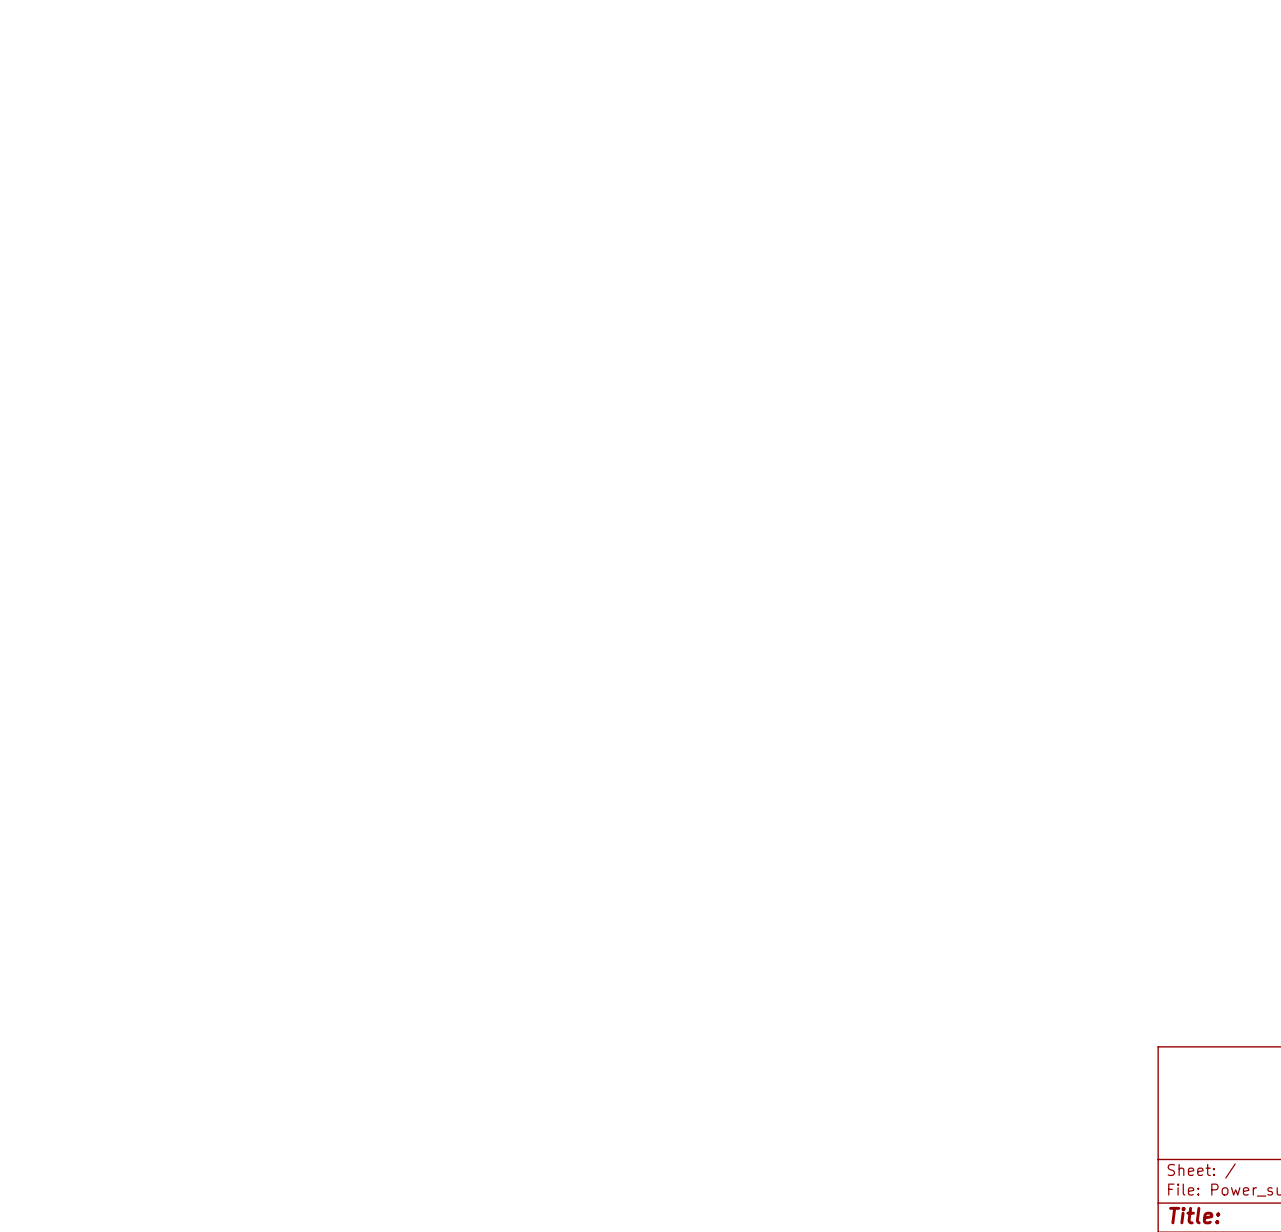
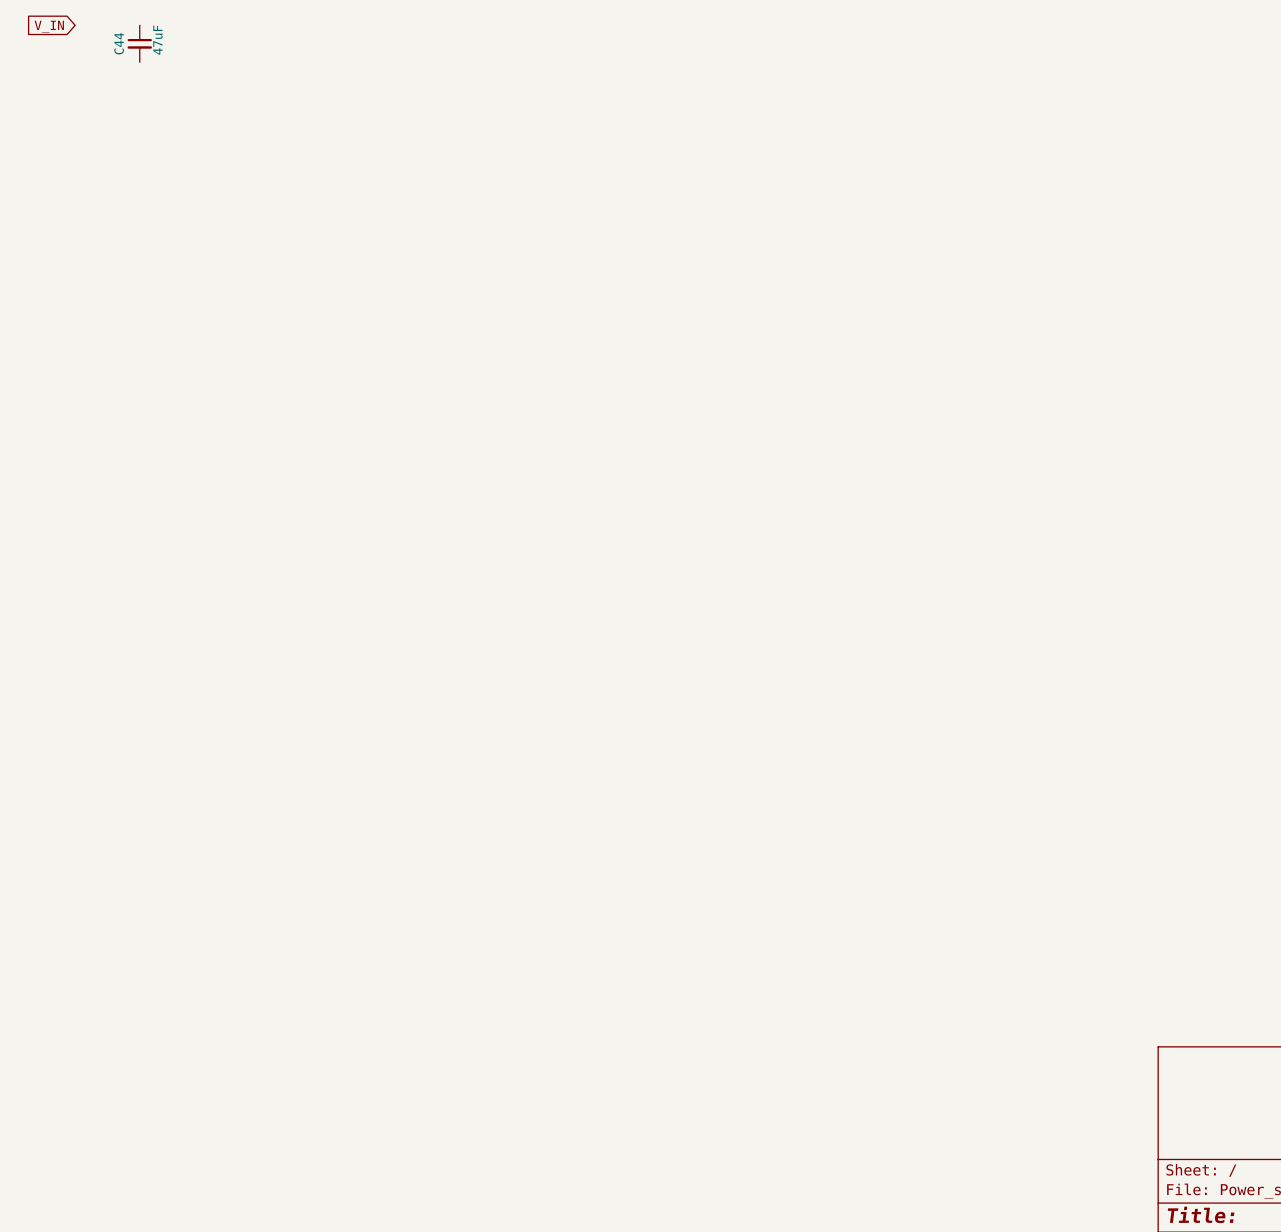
global label: none -> V_IN (49, 26)
C44: none -> 47uF (139, 43)

